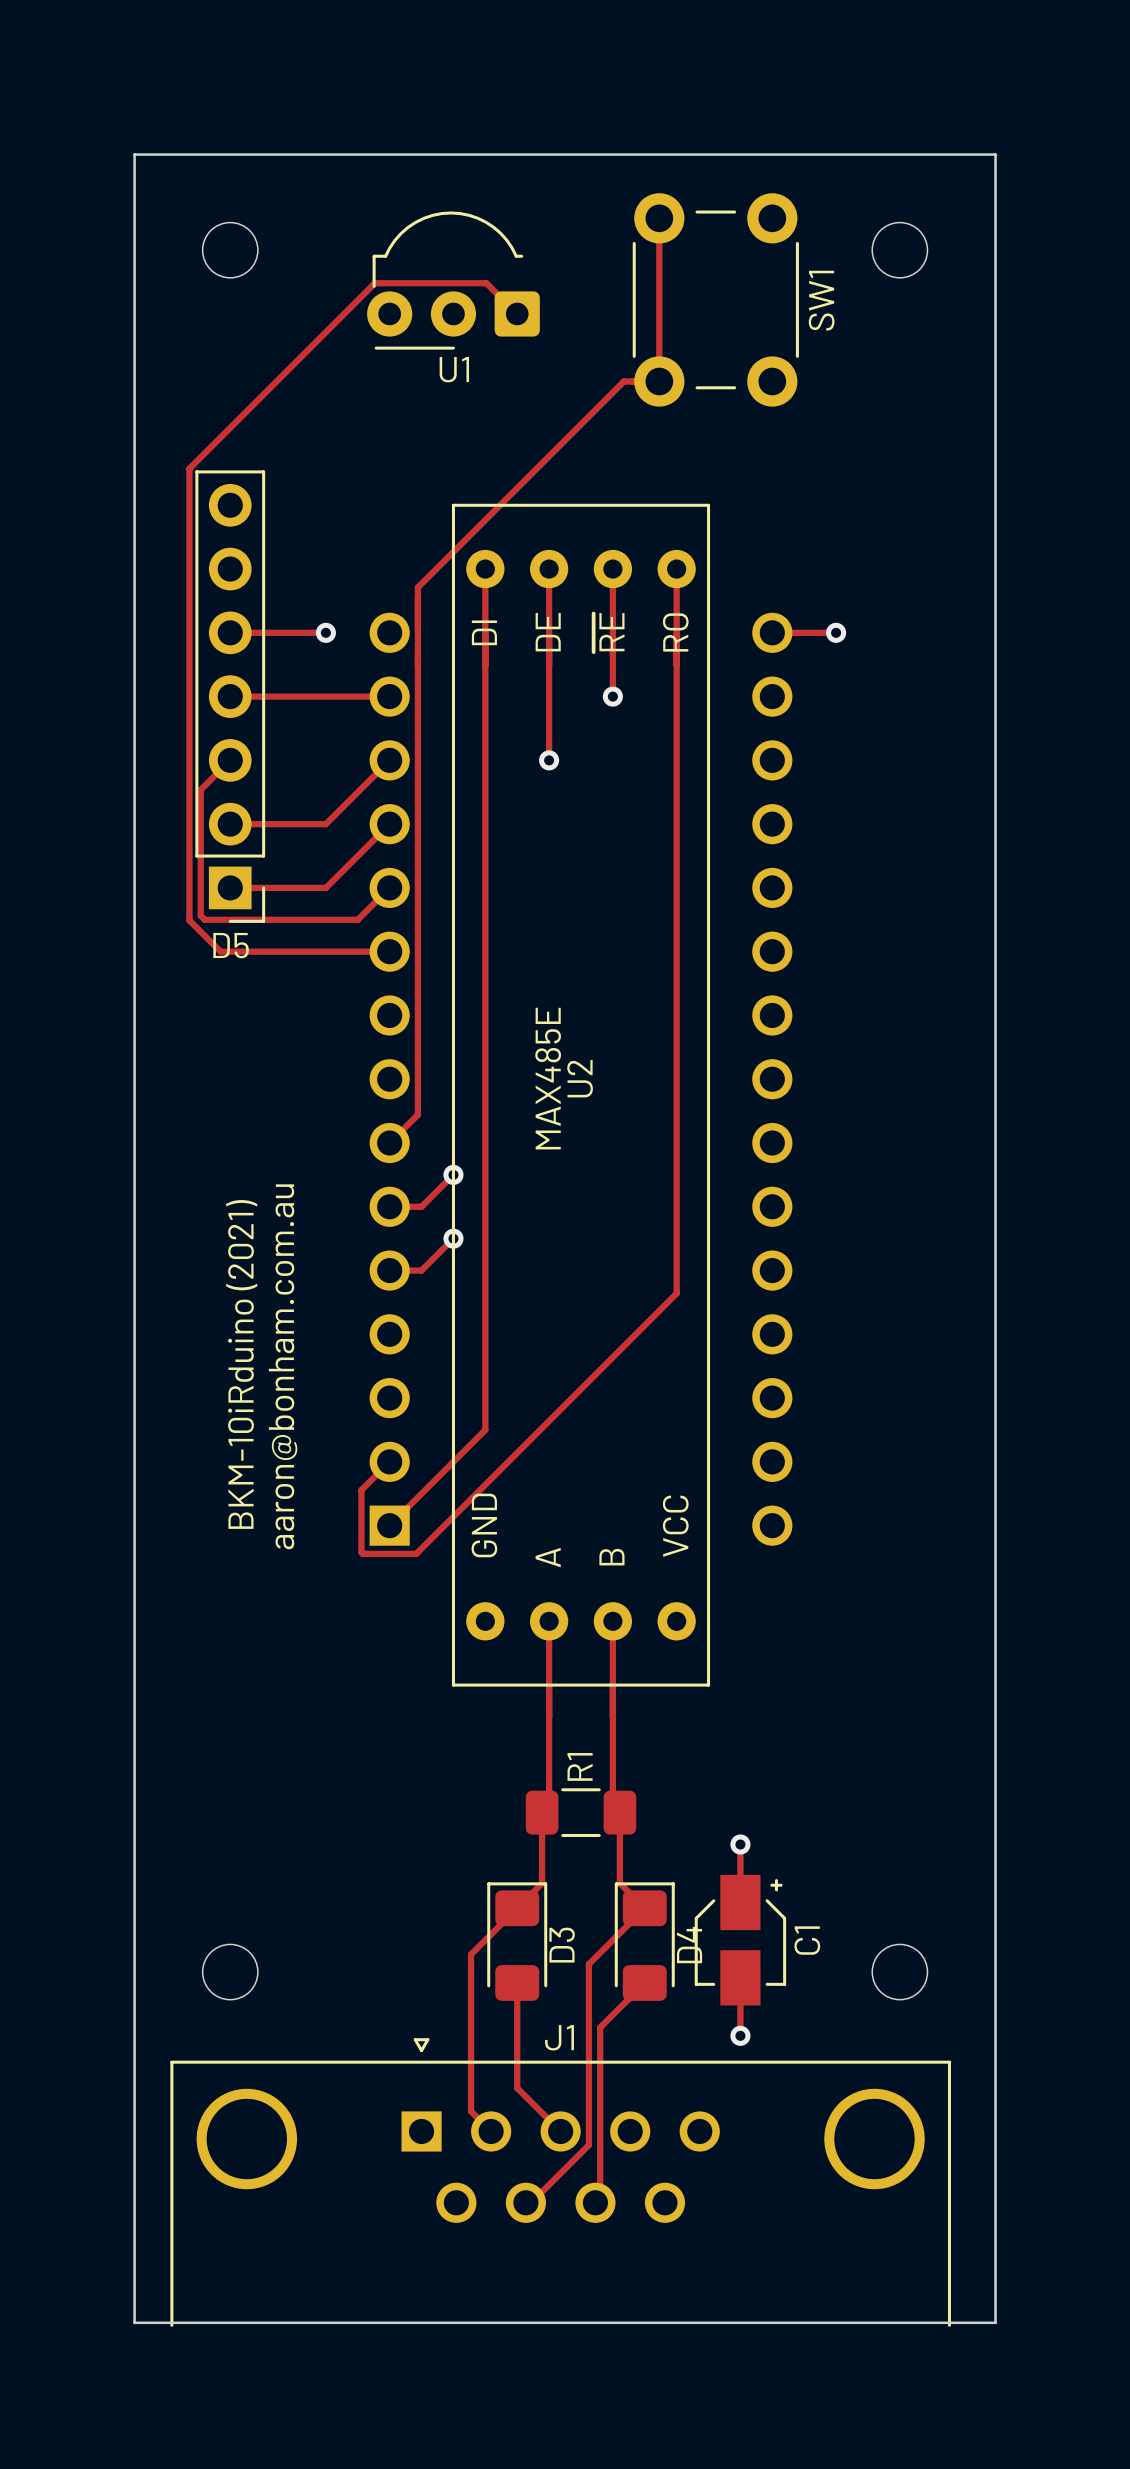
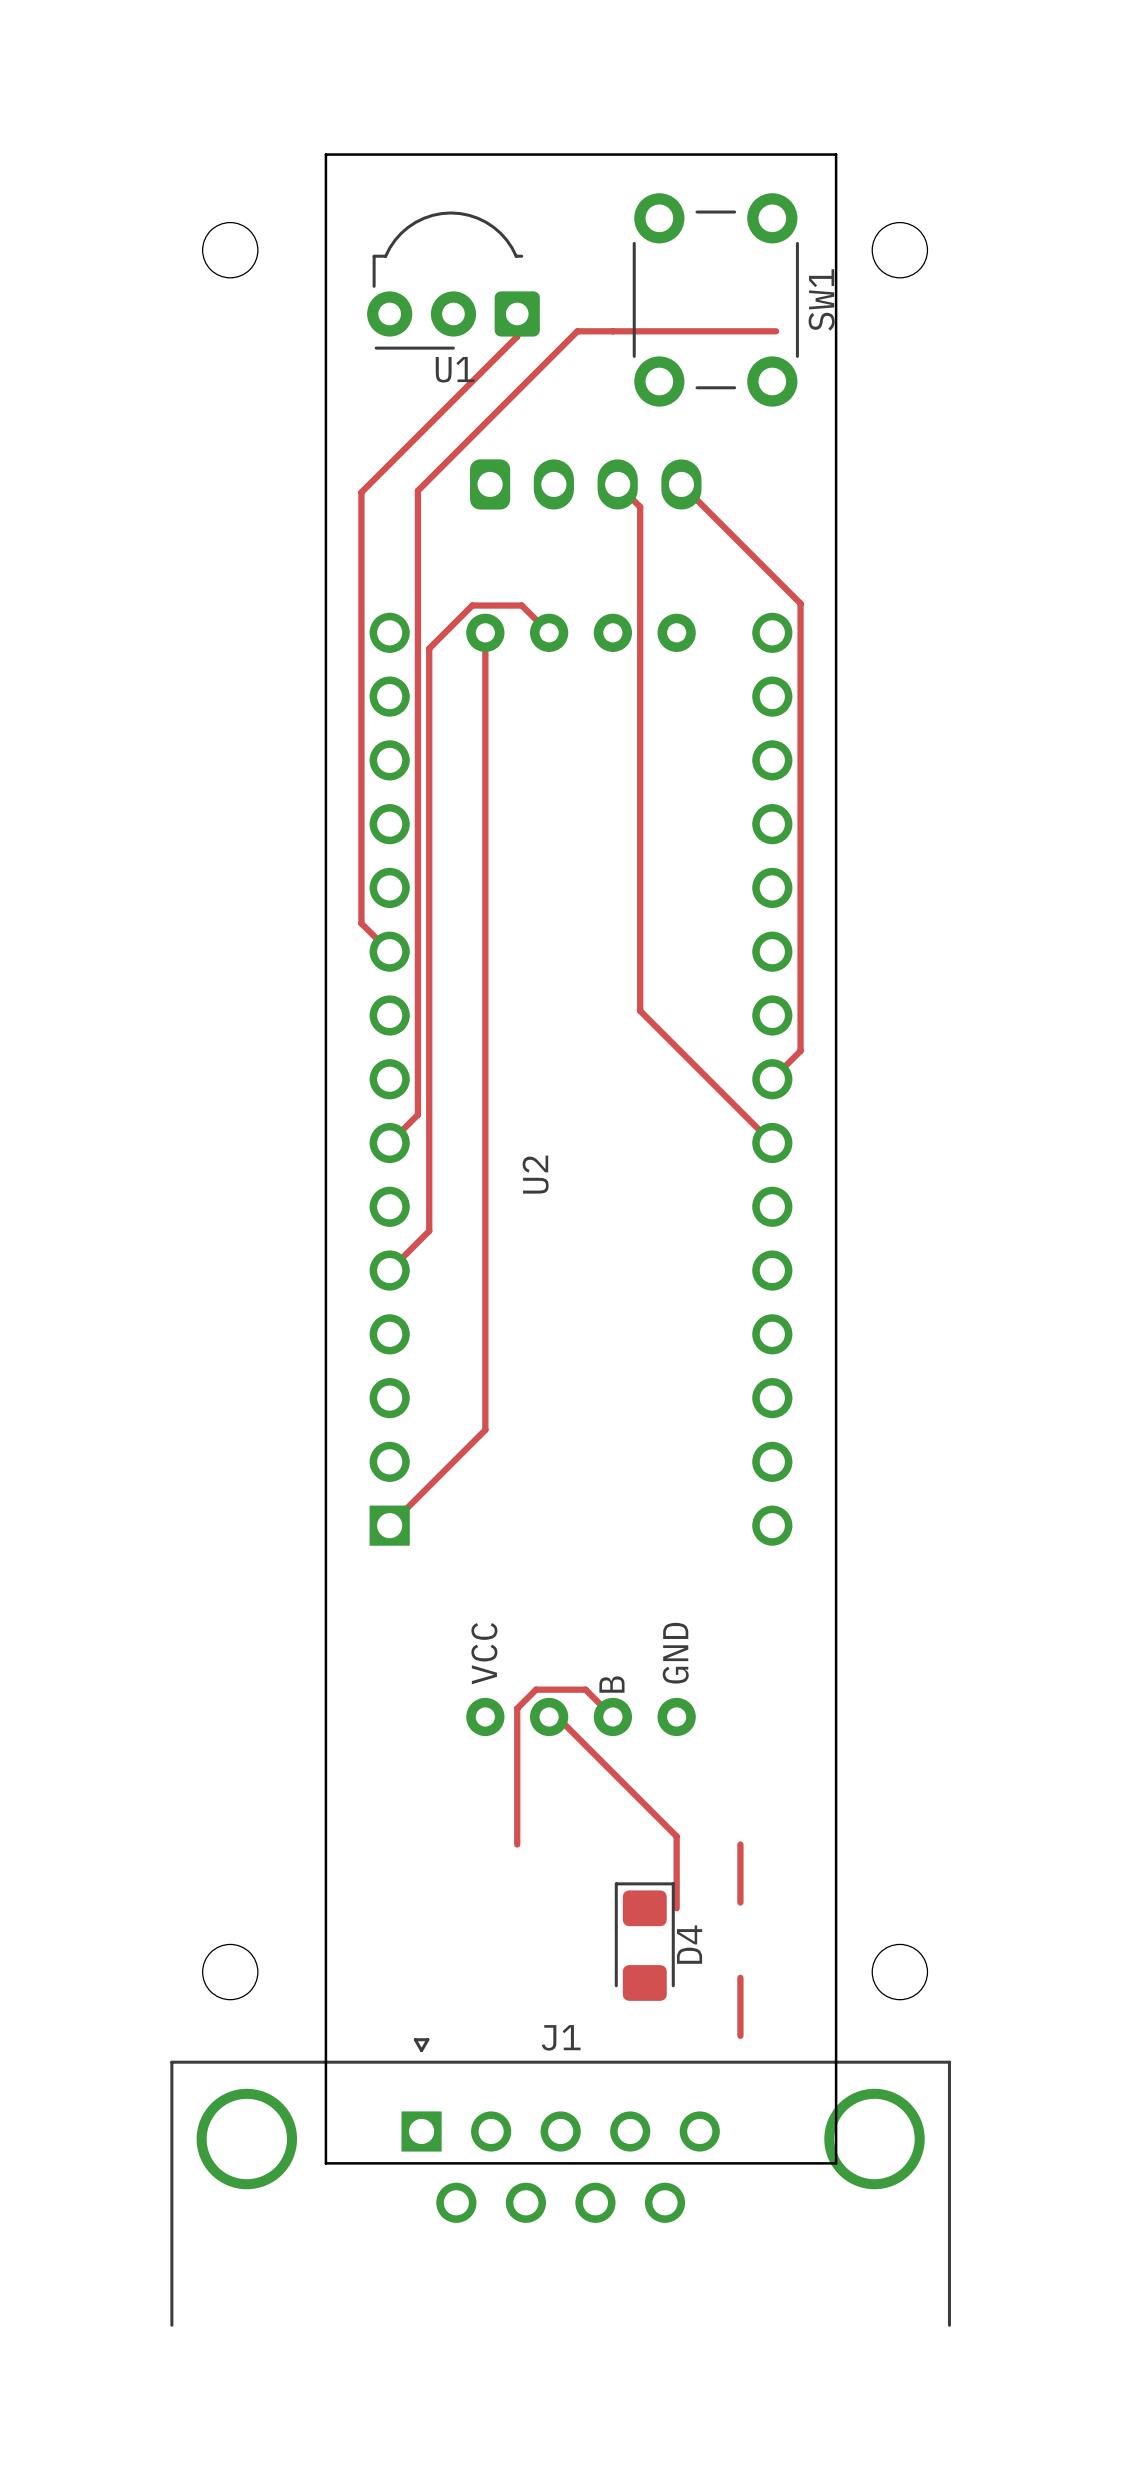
board edge: (325, 154) (134, 154) (134, 2322) (995, 2322) (995, 154) (836, 154) -> (325, 154) (325, 2163) (836, 2163) (836, 154)
track: (659, 218) (659, 381) (623, 381) (417, 587) -> (776, 331) (577, 331) (417, 490) (417, 587)
track: (517, 313) (486, 283) (374, 283) (189, 468) (189, 920) (220, 951) (389, 951) -> (517, 313) (517, 336) (361, 492) (361, 923) (389, 951)
part: none -> (585, 484)
track: none -> (617, 484) (640, 506) (640, 1010) (772, 1143)
track: none -> (681, 484) (800, 603) (800, 1050) (772, 1079)
line: (453, 505) (453, 1685) (708, 1685) (708, 505) (453, 505) -> none
U2 footprint: [466, 549, 696, 1641] -> [466, 613, 696, 1737]
track: (485, 569) (485, 632) -> none
track: (549, 569) (549, 760) -> none
track: (612, 569) (612, 696) -> none
track: (676, 569) (676, 1293) (416, 1553) (363, 1553) (361, 1552) (361, 1490) (389, 1461) -> none
track: (230, 632) (325, 632) -> none
via: (325, 632) -> none
track: (772, 632) (836, 632) -> none
via: (836, 632) -> none
track: (230, 696) (389, 696) -> none
D5: (230, 696) -> none
via: (612, 696) -> none
track: (230, 760) (200, 789) (200, 915) (204, 919) (357, 919) (389, 887) -> none
track: (389, 760) (325, 824) (230, 824) -> none
via: (549, 760) -> none
track: (389, 824) (325, 887) (230, 887) -> none
track: (453, 1174) (421, 1206) (389, 1206) -> none
via: (453, 1174) -> none
track: (453, 1238) (421, 1270) (389, 1270) -> (549, 632) (521, 605) (472, 605) (429, 648) (429, 1231) (389, 1270)
via: (453, 1238) -> none
text: BKM-10iRduino (2021) (241, 1364) -> none
text: aaron@bonham.com.au (283, 1366) -> none
track: (549, 1621) (549, 1805) (542, 1812) (542, 1883) (471, 1954) (471, 2111) (491, 2131) -> none
track: (612, 1621) (612, 1805) (619, 1812) (619, 1883) (644, 1908) (588, 1964) (588, 2145) (531, 2202) (525, 2202) -> none
text: none -> VCC (484, 1653)
text: none -> GND (675, 1653)
text: none -> B (611, 1684)
track: none -> (549, 1716) (557, 1716) (676, 1836) (676, 1908)
track: none -> (612, 1716) (585, 1689) (536, 1689) (517, 1708) (517, 1844)
R1: (581, 1812) -> none
via: (740, 1844) -> none
C1: (740, 1940) -> none
D3: (517, 1941) -> none
track: (517, 1982) (517, 2088) (560, 2131) -> none
track: (644, 1982) (600, 2027) (600, 2198) (595, 2202) -> none
via: (740, 2035) -> none

